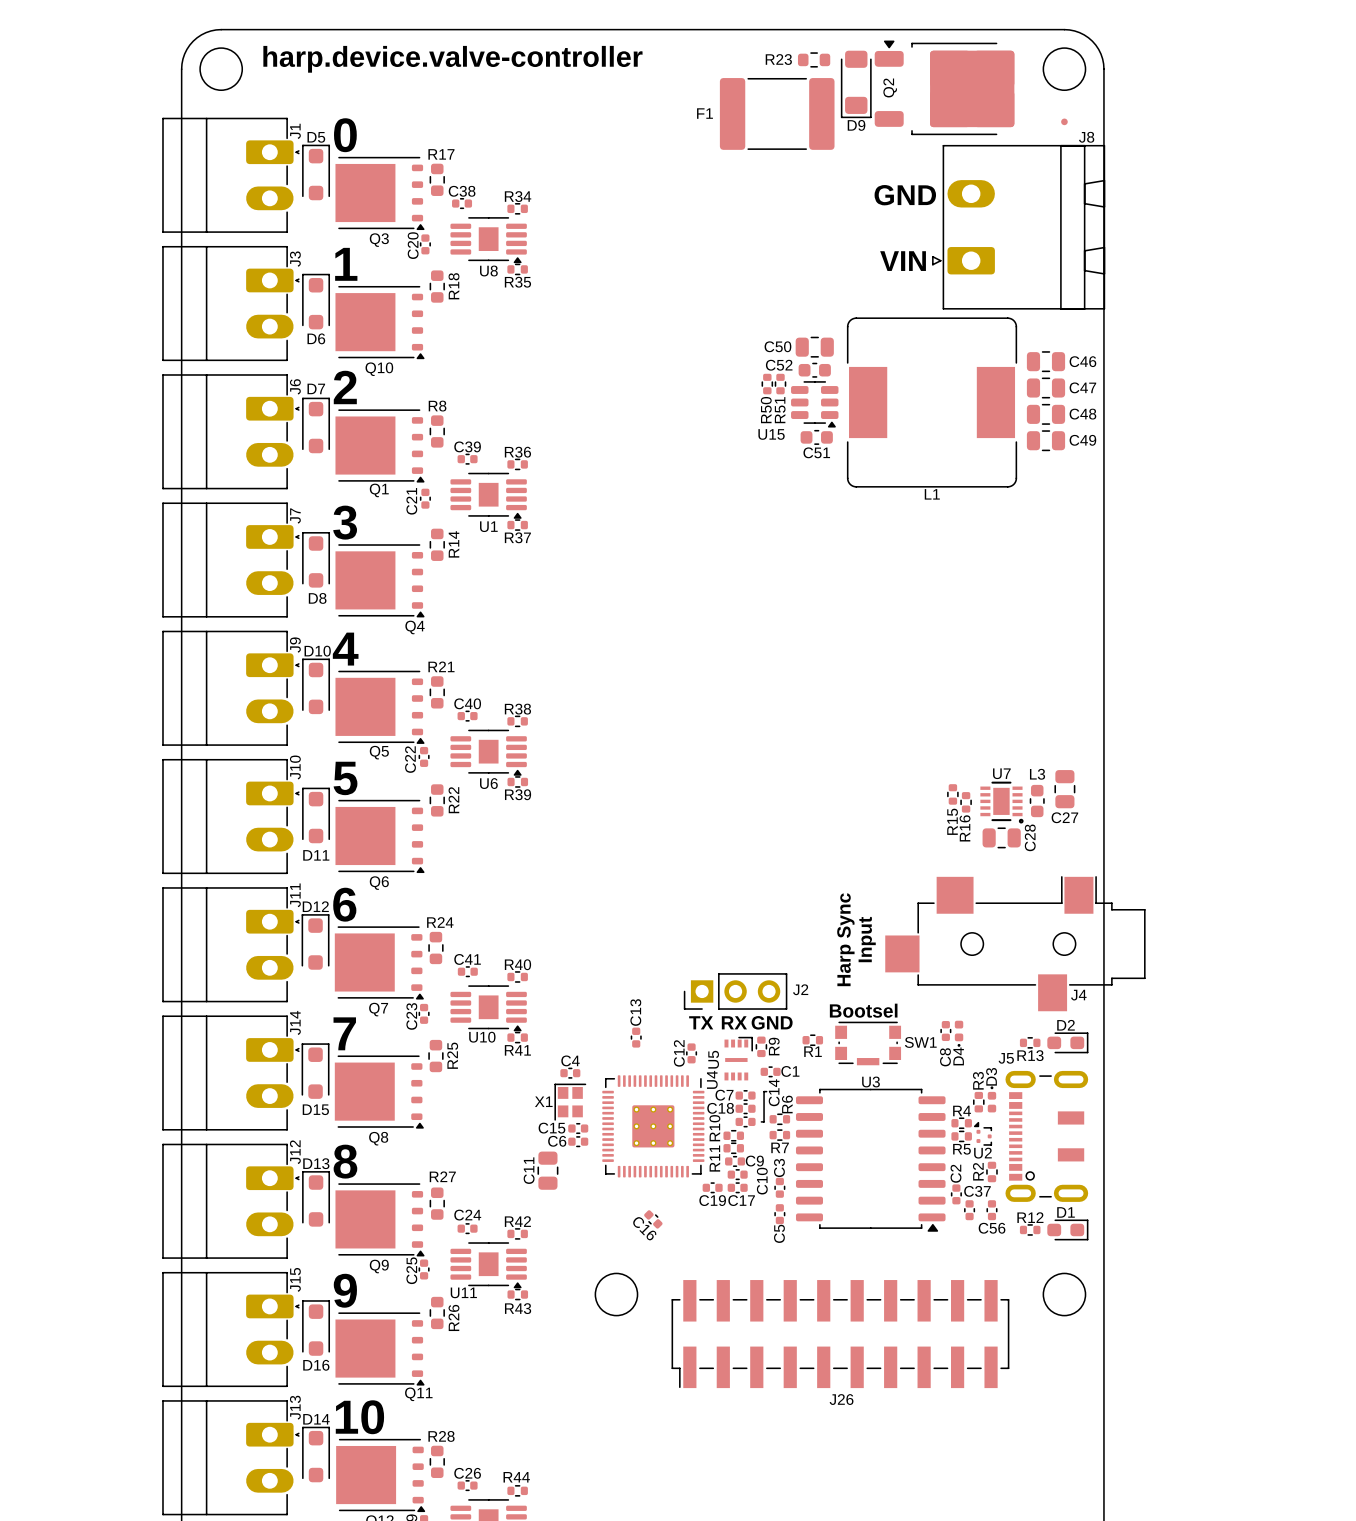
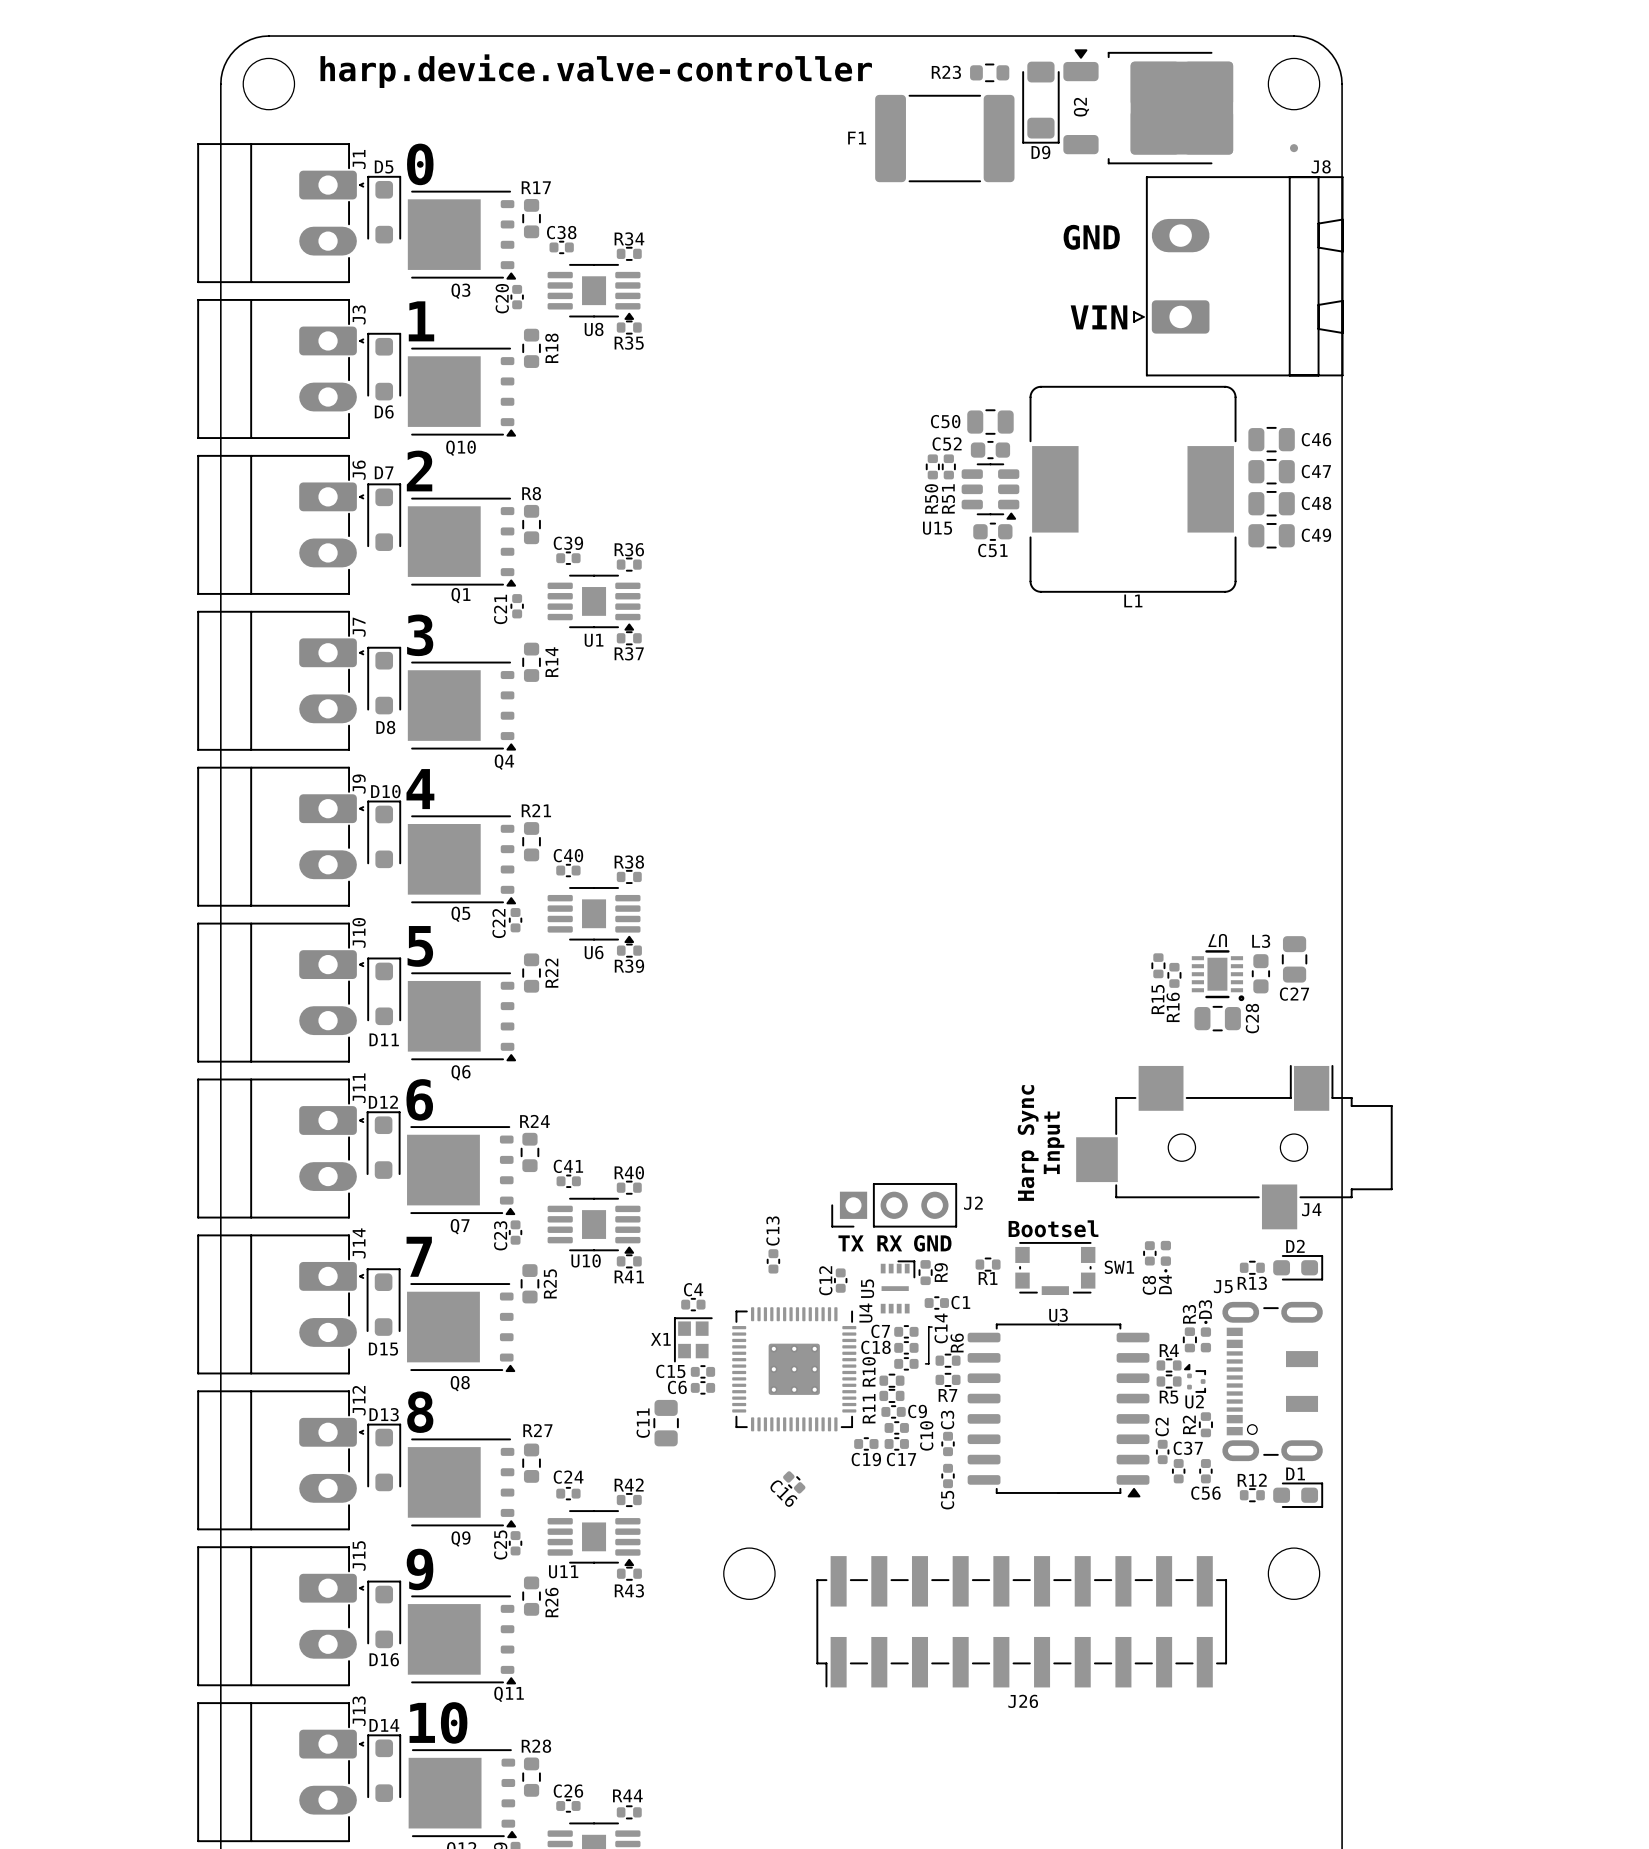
U7 name rotation: 0° (1001, 773) -> 180° (1217, 940)

